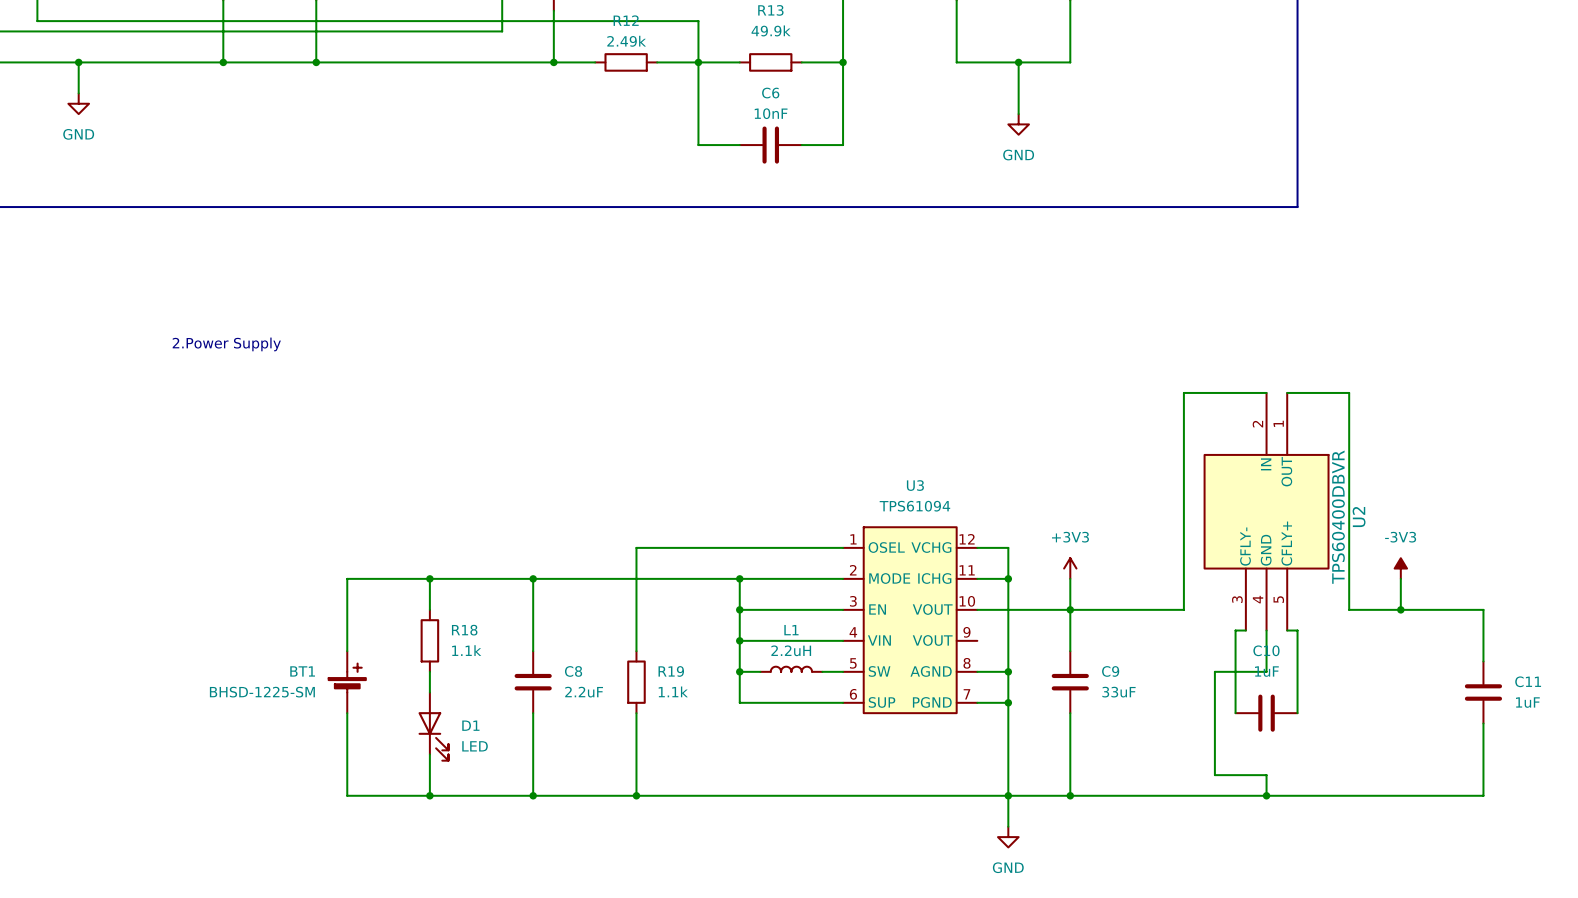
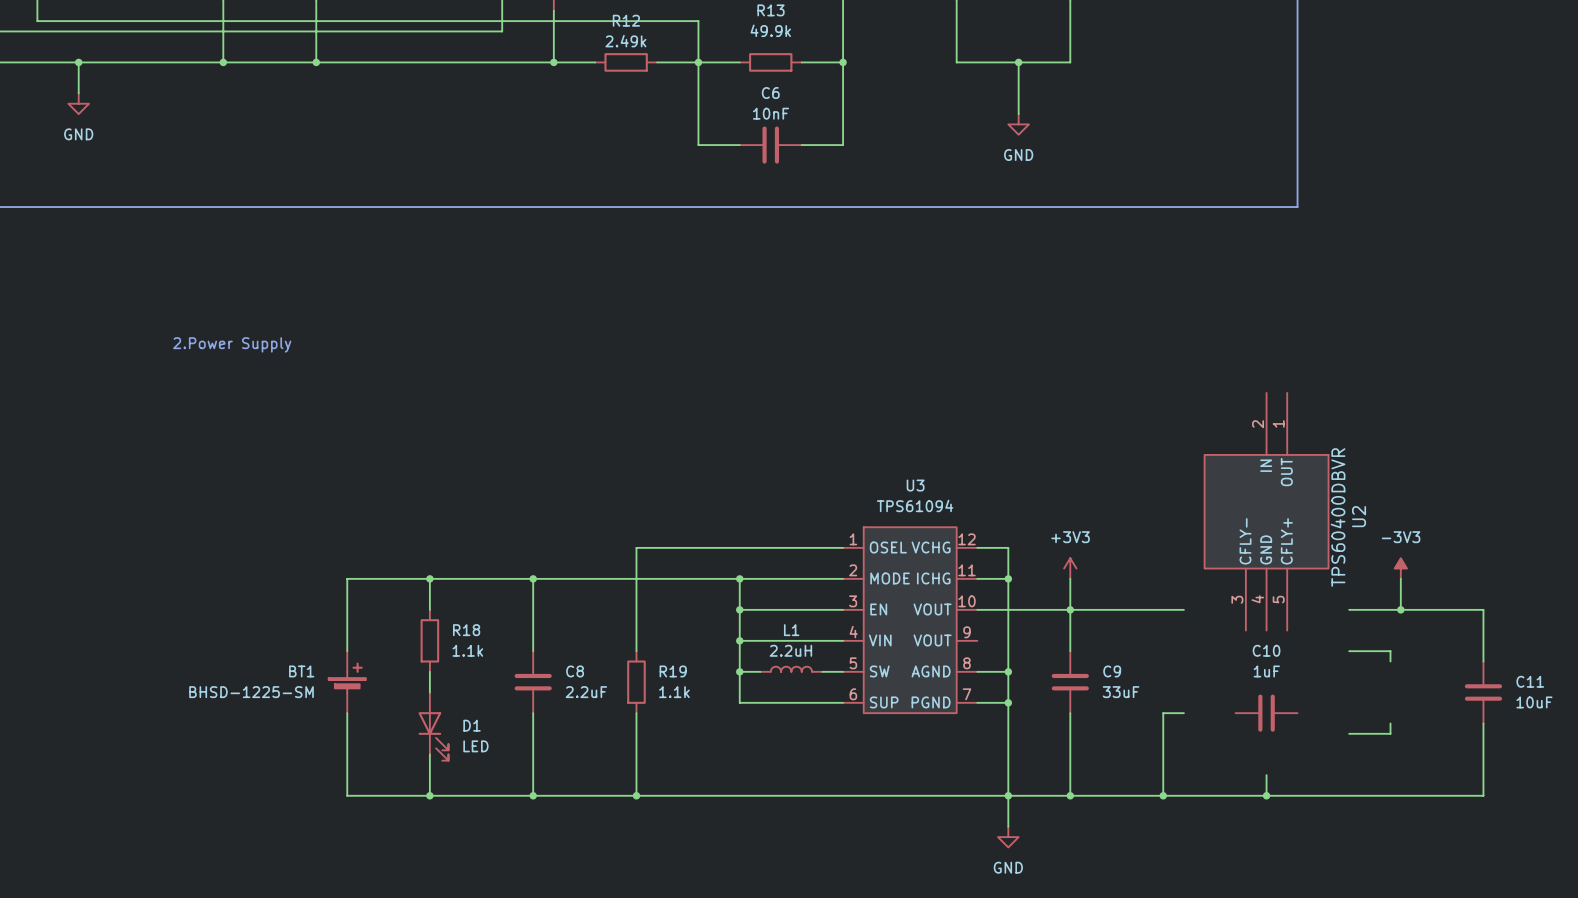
wire: (1266, 392) (1183, 392) (1183, 609) -> none
wire: (1287, 392) (1349, 392) (1349, 609) -> none
wire: (1245, 630) (1235, 630) (1235, 713) -> none
wire: (1266, 630) (1266, 671) (1214, 671) (1214, 775) (1266, 775) -> none
wire: (1287, 630) (1297, 630) (1297, 713) -> none
wire: none -> (1349, 651) (1390, 651) (1390, 661)
C11 value: 1uF (1527, 702) -> 10uF (1534, 702)
wire: none -> (1183, 713) (1163, 713) (1163, 795)
wire: none -> (1390, 723) (1390, 733) (1349, 733)
junction: none -> (1163, 795)

